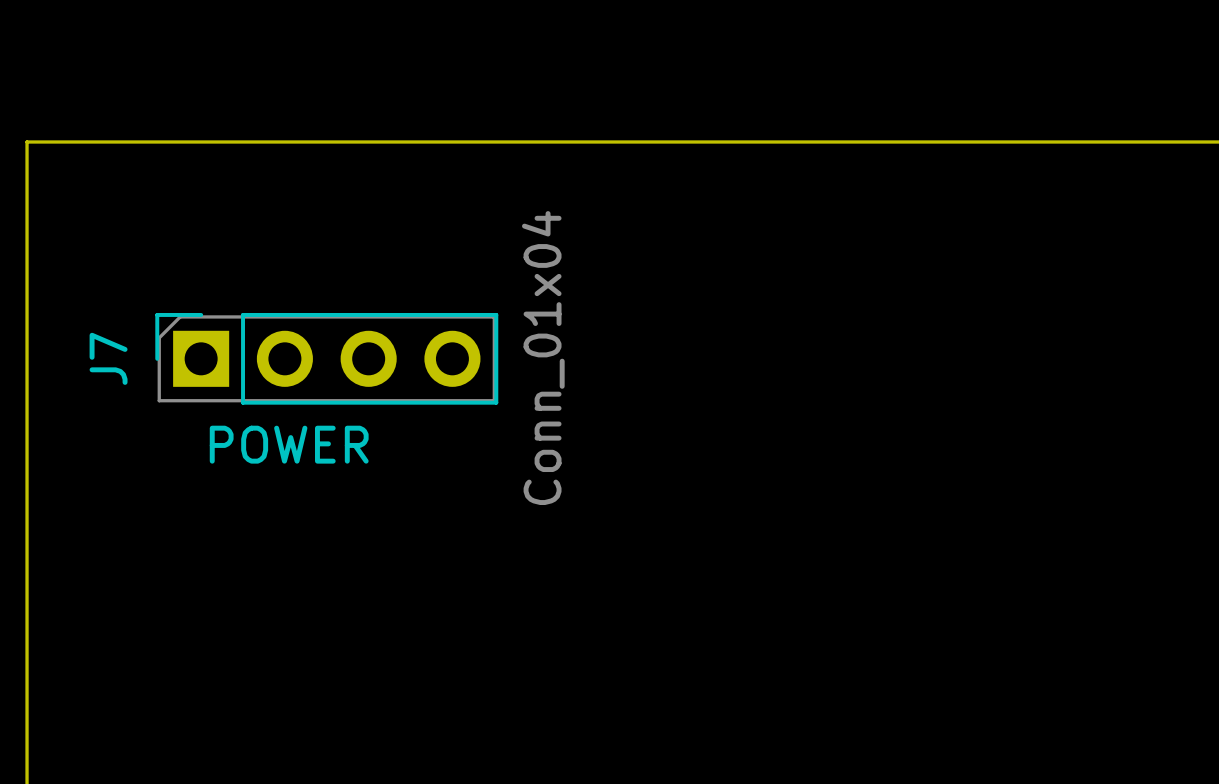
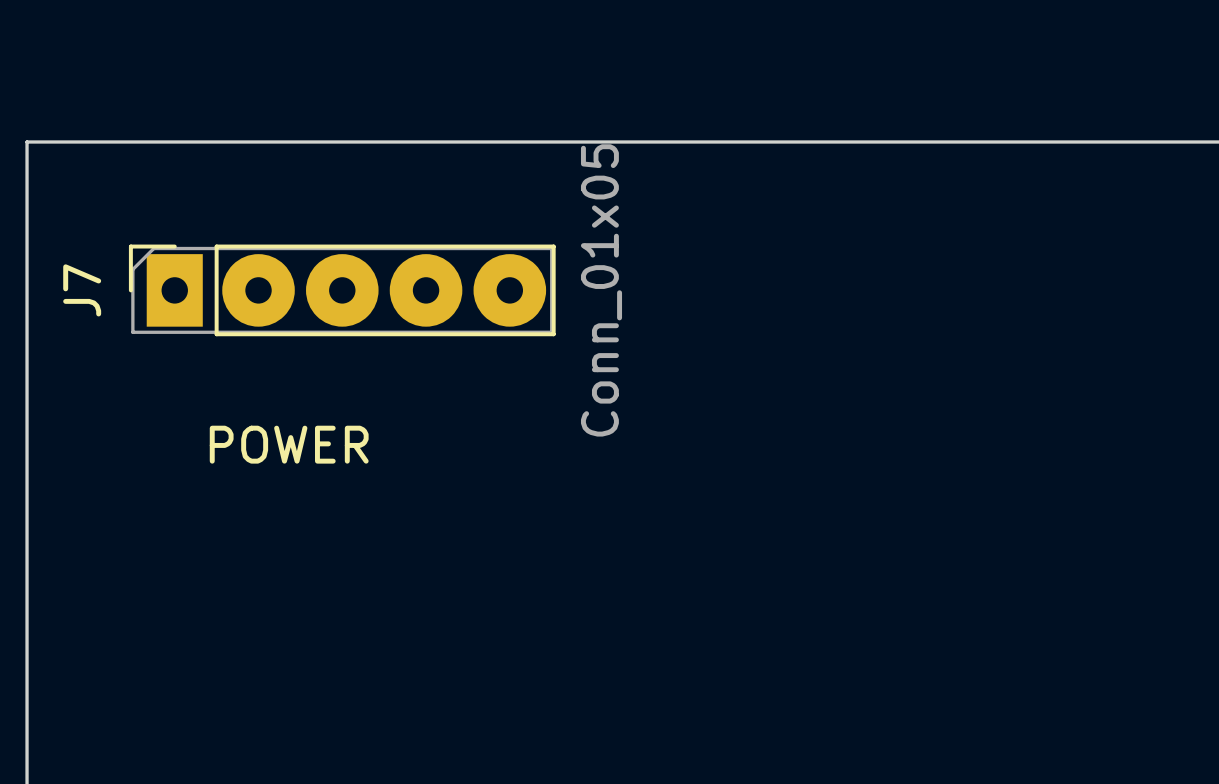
J7 footprint: [155, 312, 499, 405] -> [128, 244, 556, 337]
J7 value: Conn_01x04 (543, 358) -> Conn_01x05 (601, 290)

